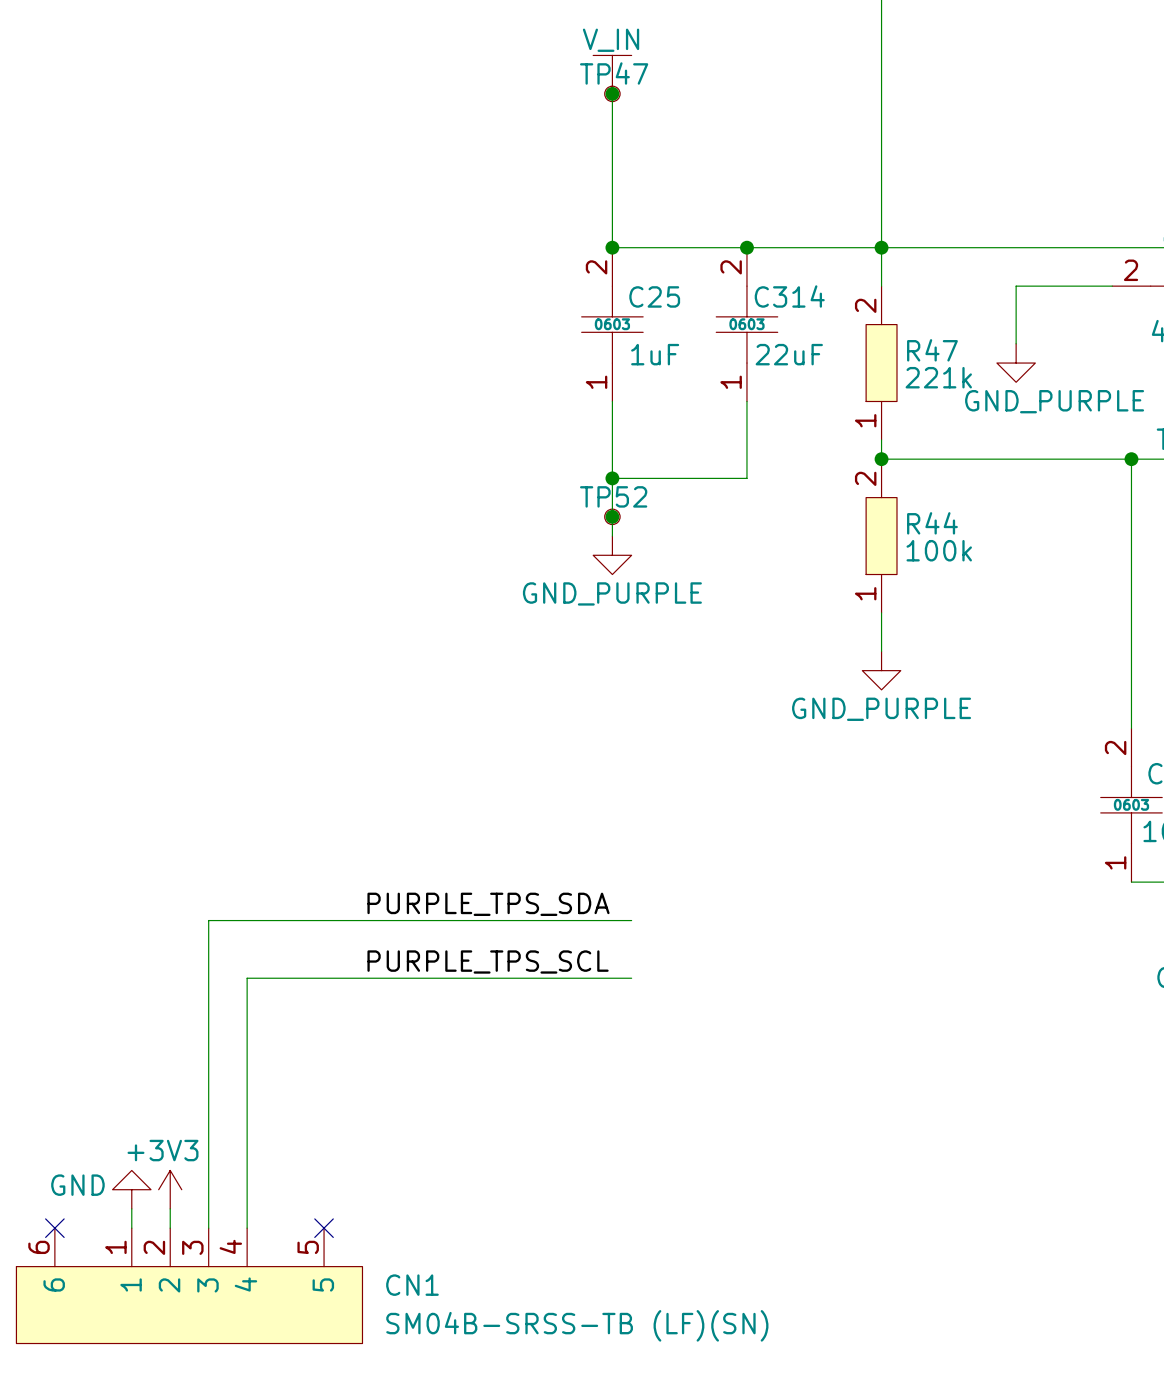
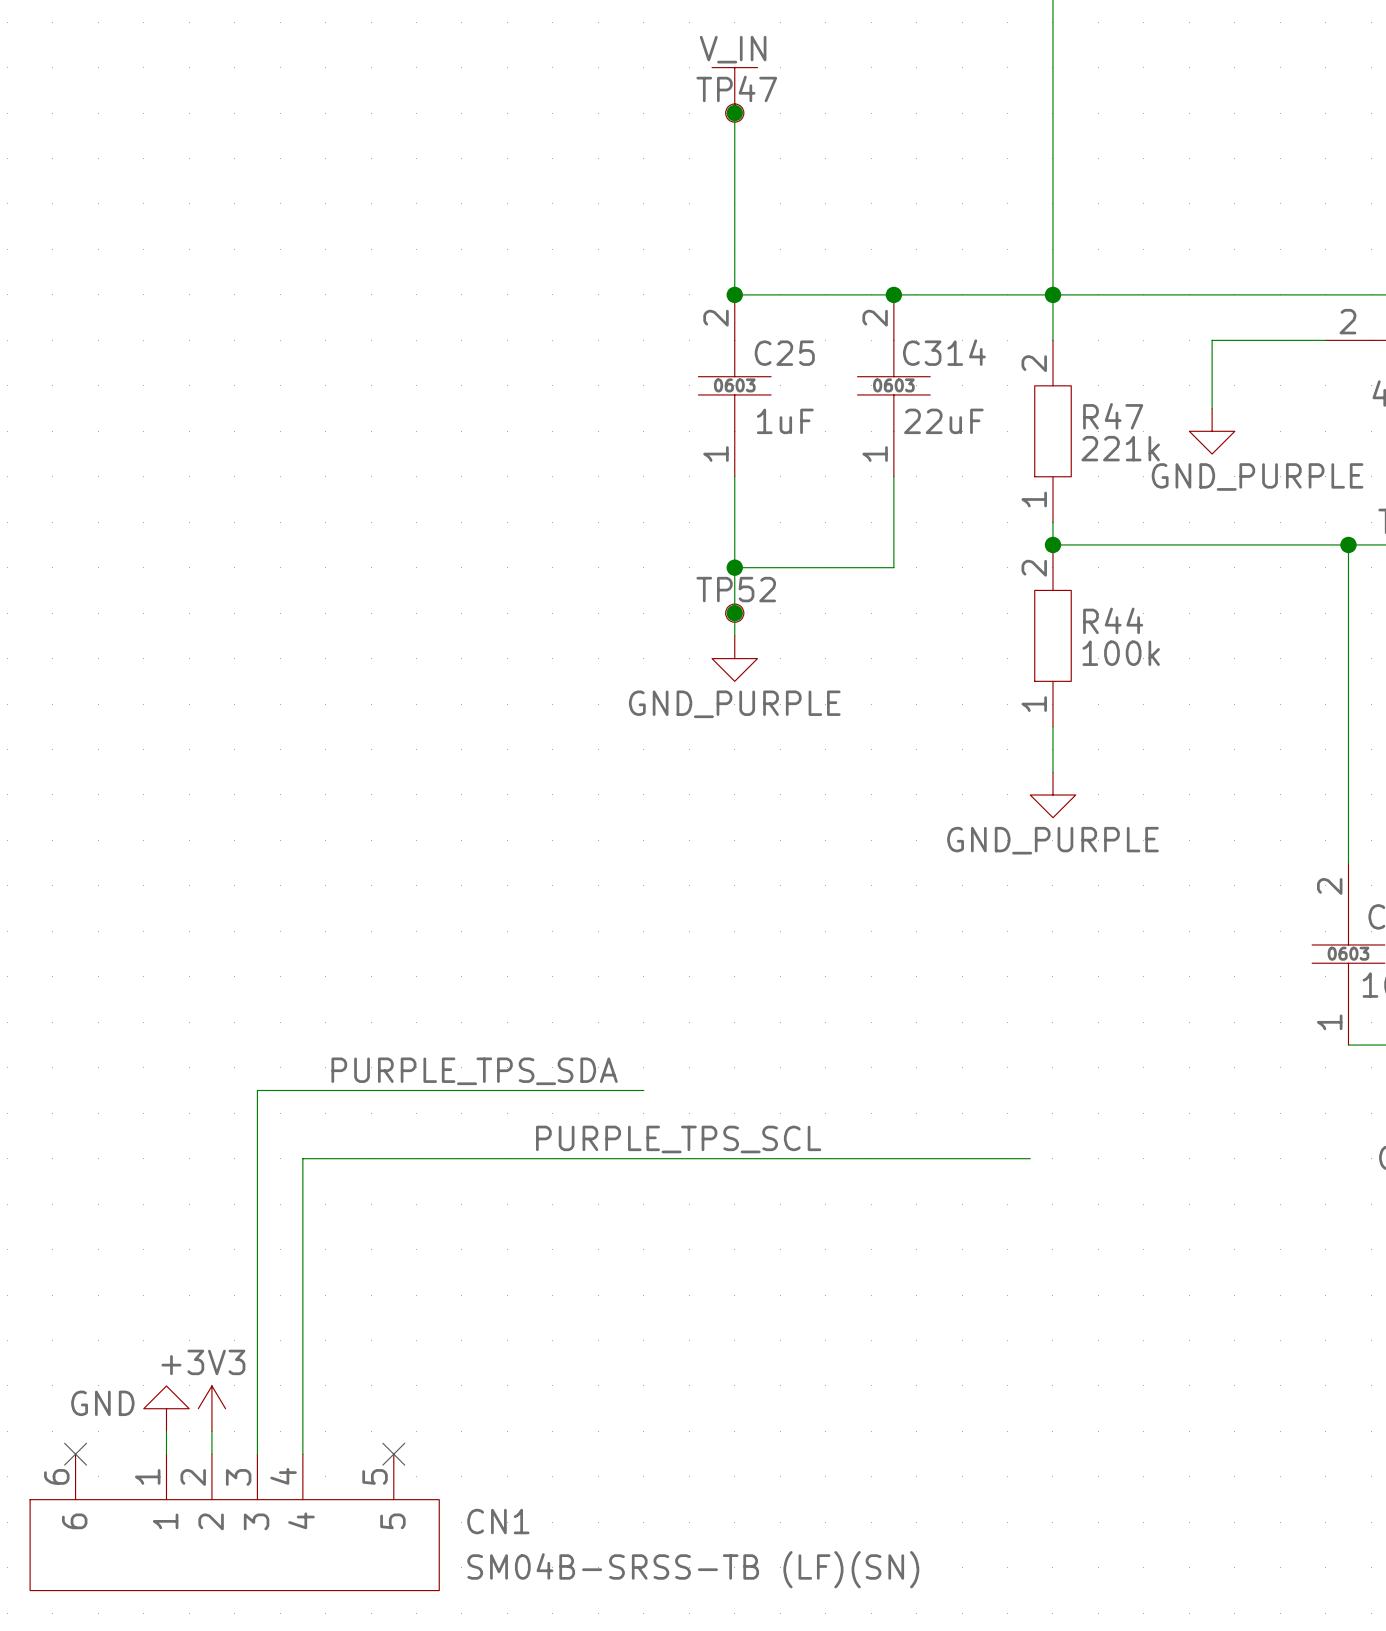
label position: PURPLE_TPS_SDA (488, 904) -> PURPLE_TPS_SDA (474, 1071)
wire: (535, 920) (631, 920) -> none
label position: PURPLE_TPS_SCL (488, 961) -> PURPLE_TPS_SCL (678, 1139)
wire: none -> (757, 1158) (1030, 1158)

